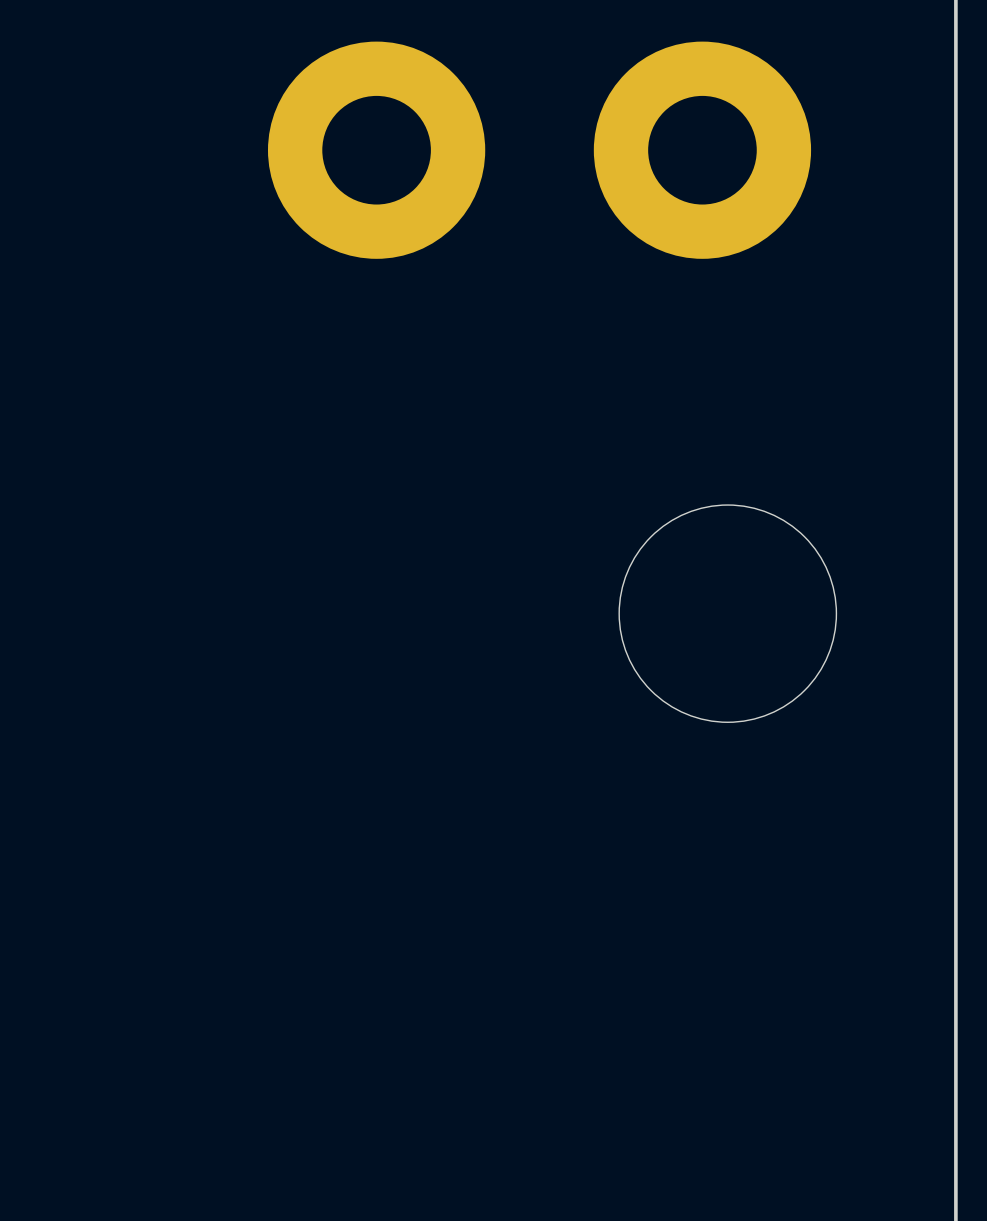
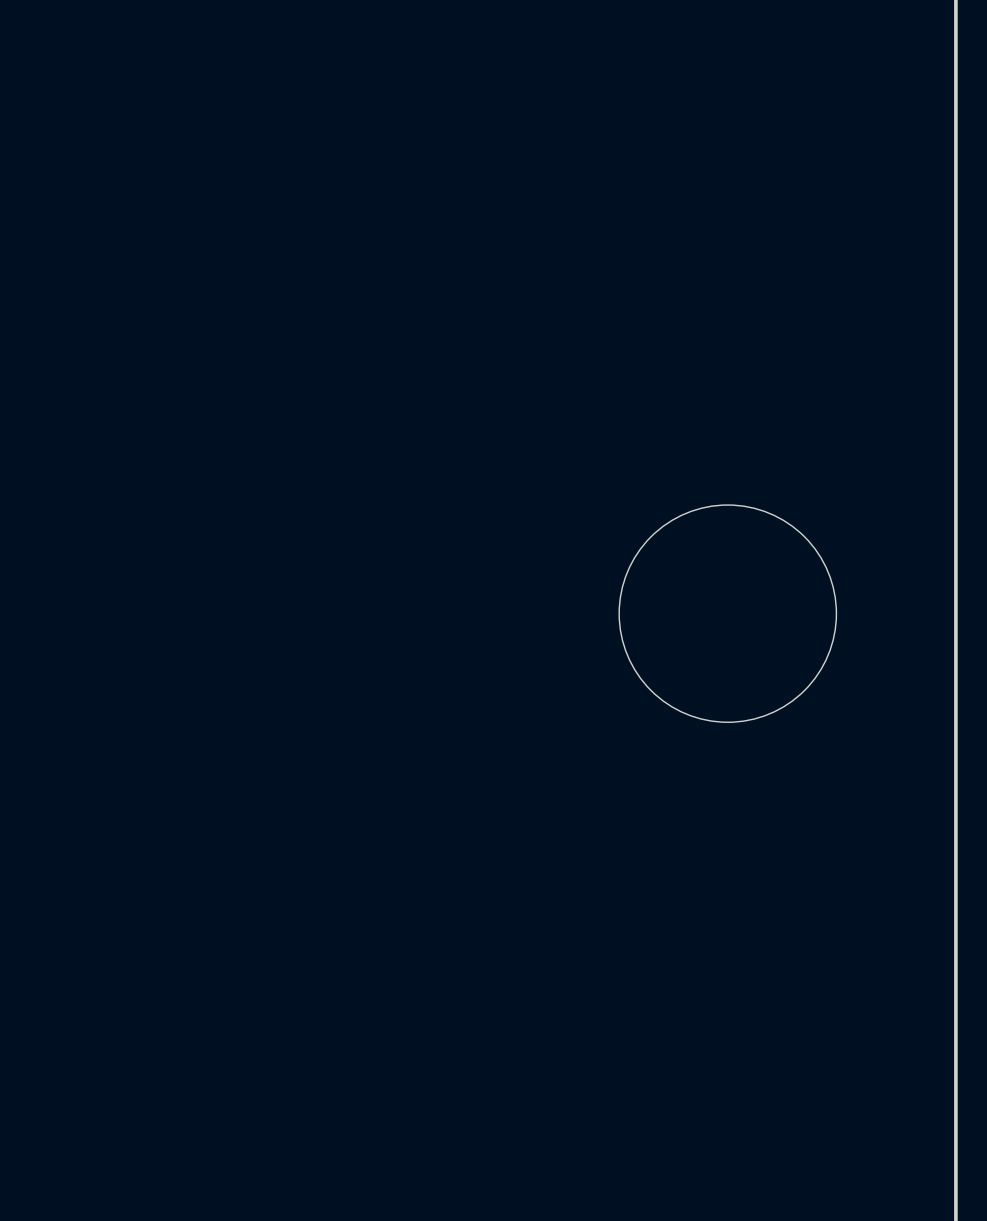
part: (376, 150) -> none
part: (702, 150) -> none

